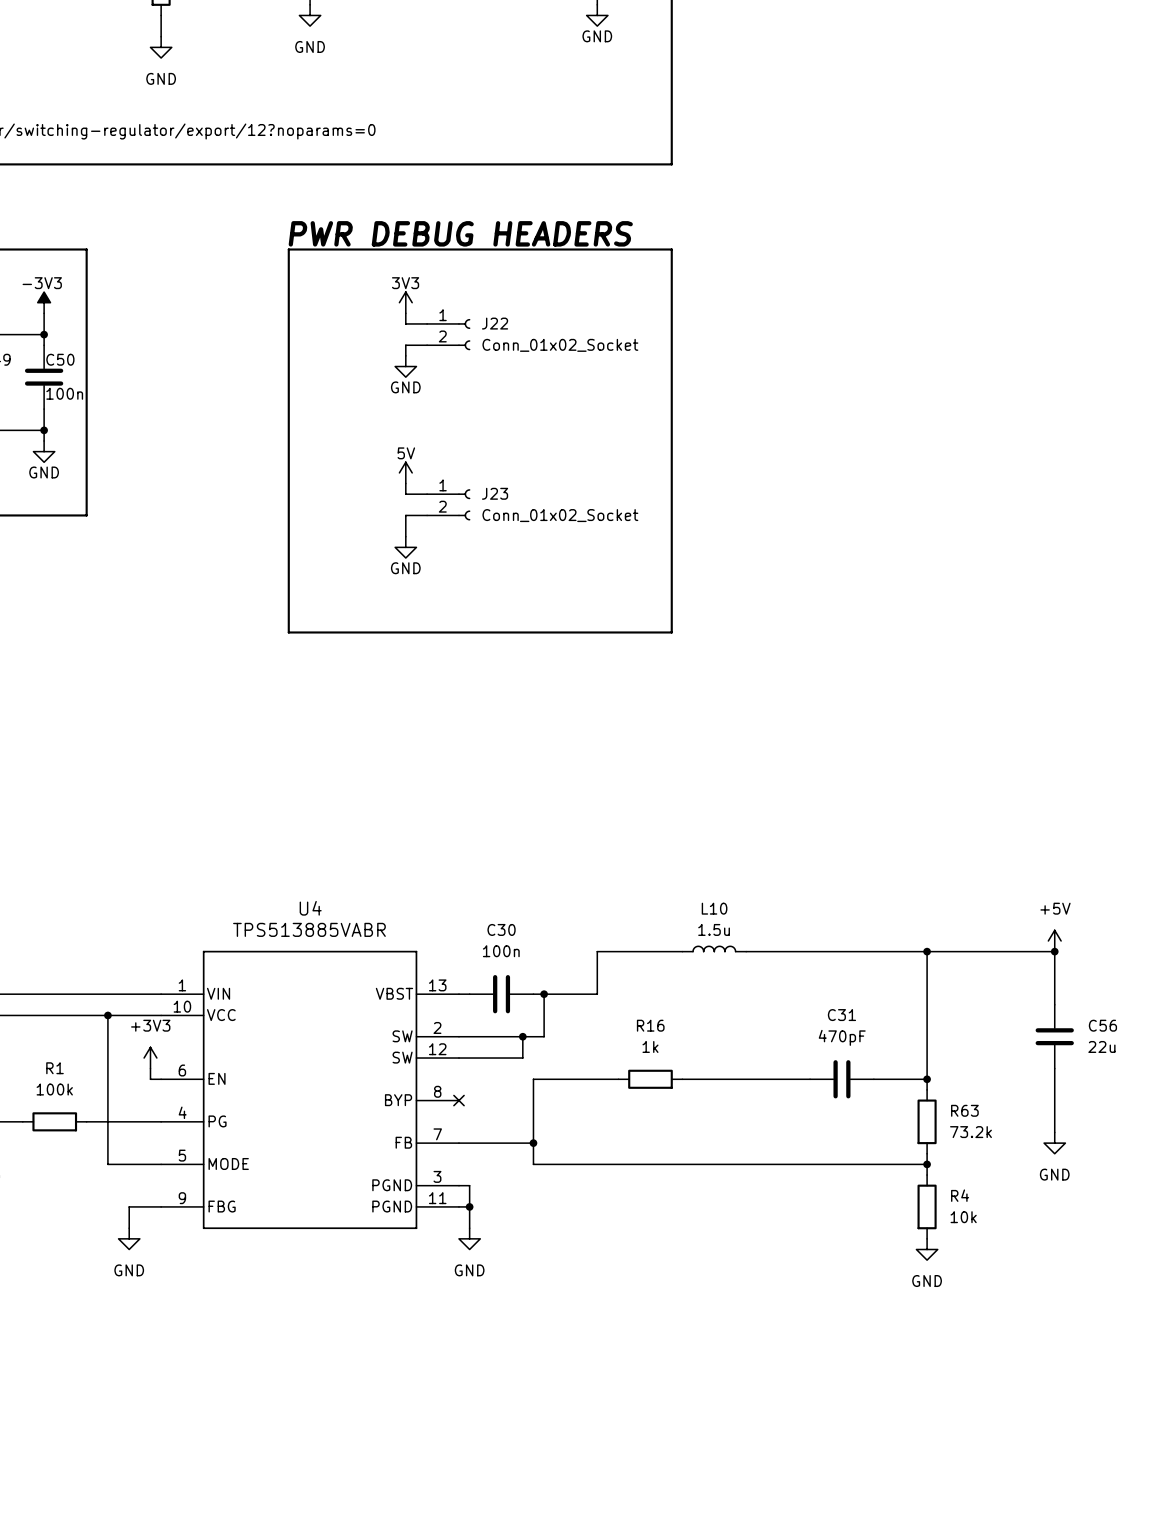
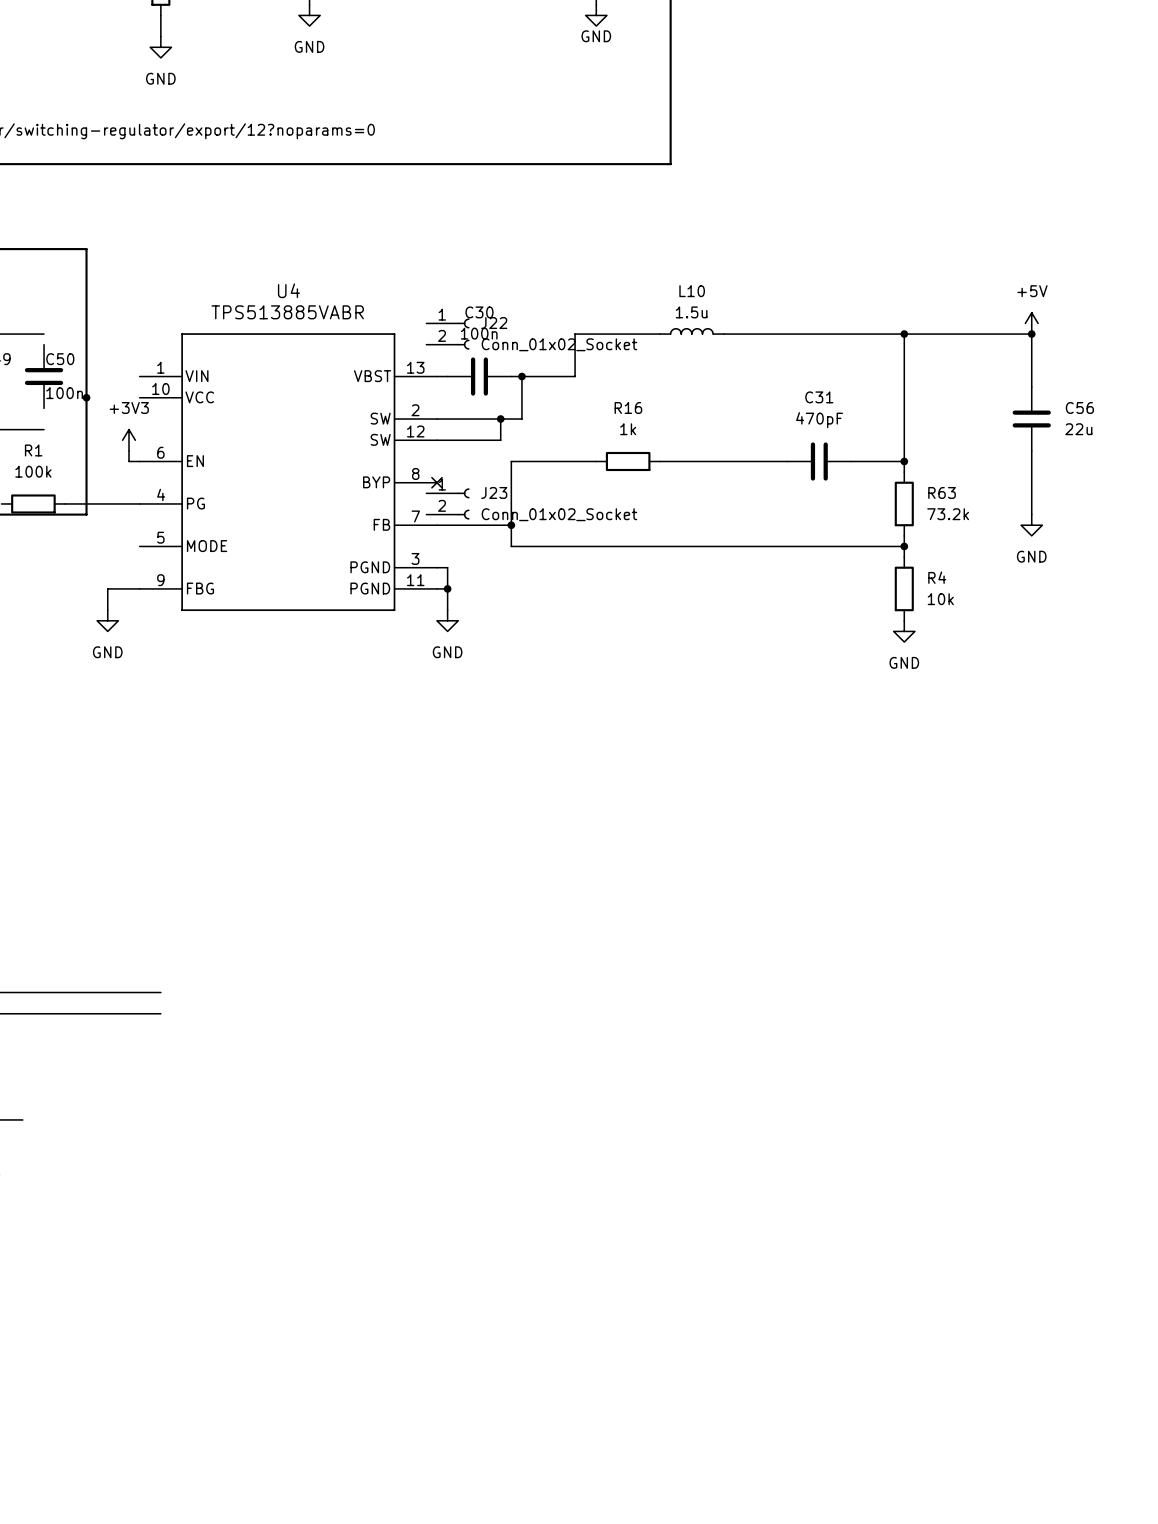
text: PWR DEBUG HEADERS (460, 233) -> none
line: (288, 249) (671, 249) (671, 632) (288, 632) (288, 249) -> none
power symbol: -3V3 (44, 302) -> none
power symbol: 3V3 (405, 302) -> none
wire: (44, 313) (44, 345) -> none
wire: (405, 313) (405, 323) (427, 323) -> none
power symbol: none -> +5V (1031, 323)
junction: (44, 334) -> none
wire: none -> (660, 334) (575, 334) (575, 376) (511, 376)
wire: none -> (723, 334) (1031, 334) (1031, 387)
wire: none -> (904, 334) (904, 472)
junction: none -> (904, 334)
junction: none -> (1031, 334)
wire: (427, 345) (405, 345) (405, 355) -> none
power symbol: GND (405, 366) -> none
wire: none -> (436, 376) (447, 376)
wire: none -> (521, 376) (521, 419) (436, 419)
junction: none -> (521, 376)
junction: none -> (86, 397)
wire: (44, 409) (44, 440) -> none
wire: none -> (500, 419) (500, 440) (436, 440)
junction: none -> (500, 419)
junction: (44, 430) -> none
power symbol: none -> +3V3 (128, 440)
power symbol: GND (44, 451) -> none
wire: none -> (128, 450) (128, 461) (139, 461)
wire: none -> (1031, 450) (1031, 514)
wire: none -> (596, 461) (511, 461) (511, 546) (904, 546)
wire: none -> (660, 461) (787, 461)
wire: none -> (851, 461) (904, 461)
junction: none -> (904, 461)
power symbol: 5V (405, 472) -> none
wire: (405, 483) (405, 494) (427, 494) -> none
no-connect mark: none -> (436, 482)
wire: none -> (65, 503) (139, 503)
wire: (427, 515) (405, 515) (405, 536) -> none
wire: none -> (436, 525) (511, 525)
junction: none -> (511, 525)
power symbol: none -> GND (1031, 525)
wire: none -> (904, 535) (904, 557)
power symbol position: GND (405, 547) -> GND (447, 620)
junction: none -> (904, 546)
power symbol text position: GND (405, 568) -> GND (447, 652)
wire: none -> (436, 567) (447, 567) (447, 610)
wire: none -> (139, 588) (107, 588) (107, 610)
wire: none -> (436, 588) (447, 588)
junction: none -> (447, 588)
power symbol: none -> GND (107, 620)
power symbol: none -> GND (904, 631)
power symbol: +5V (1054, 940) -> none
L10 position: (714, 948) -> (691, 331)
wire: (682, 951) (597, 951) (597, 994) (533, 994) -> none
wire: (746, 951) (1054, 951) (1054, 1004) -> none
wire: (927, 951) (927, 1089) -> none
junction: (927, 951) -> none
junction: (1054, 951) -> none
wire: (459, 994) (469, 994) -> none
C30 position: (501, 994) -> (479, 376)
wire: (544, 994) (544, 1036) (459, 1036) -> none
junction: (544, 994) -> none
wire: (107, 1015) (107, 1164) (161, 1164) -> none
junction: (107, 1015) -> none
wire: (522, 1036) (522, 1058) (459, 1058) -> none
junction: (522, 1036) -> none
C56 position: (1054, 1036) -> (1031, 419)
power symbol: +3V3 (150, 1058) -> none
wire: (150, 1068) (150, 1079) (161, 1079) -> none
wire: (1054, 1068) (1054, 1132) -> none
wire: (618, 1079) (533, 1079) (533, 1164) (927, 1164) -> none
R16 position: (650, 1079) -> (628, 461)
wire: (682, 1079) (810, 1079) -> none
C31 position: (841, 1079) -> (819, 461)
wire: (873, 1079) (927, 1079) -> none
junction: (927, 1079) -> none
U4 position: (310, 1089) -> (288, 472)
no-connect mark: (459, 1100) -> none
R1 position: (54, 1121) -> (33, 503)
wire: (86, 1121) (161, 1121) -> none
R63 position: (927, 1121) -> (904, 503)
wire: (459, 1143) (533, 1143) -> none
junction: (533, 1143) -> none
power symbol: GND (1054, 1143) -> none
wire: (927, 1153) (927, 1175) -> none
junction: (927, 1164) -> none
wire: (459, 1185) (469, 1185) (469, 1228) -> none
wire: (161, 1206) (129, 1206) (129, 1228) -> none
wire: (459, 1206) (469, 1206) -> none
junction: (469, 1206) -> none
R4 position: (927, 1206) -> (904, 588)
power symbol: GND (129, 1238) -> none
power symbol: GND (469, 1238) -> none
power symbol: GND (927, 1249) -> none

